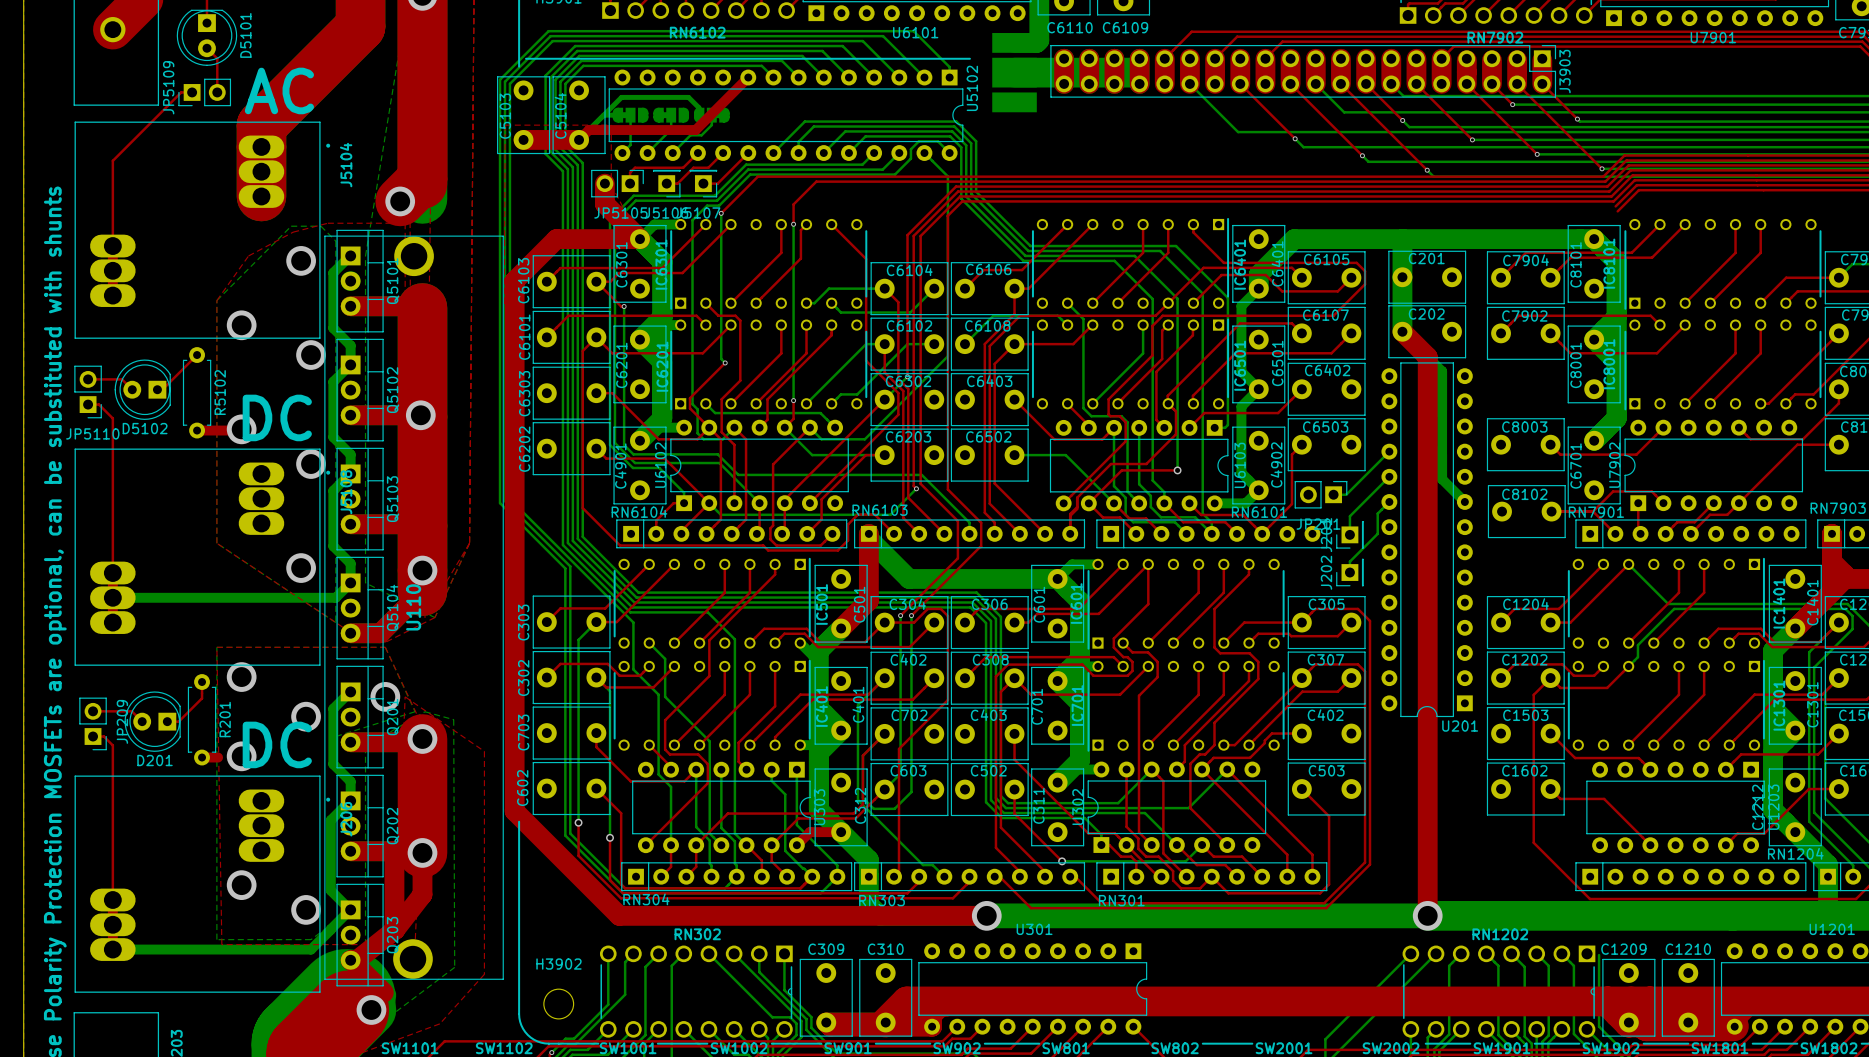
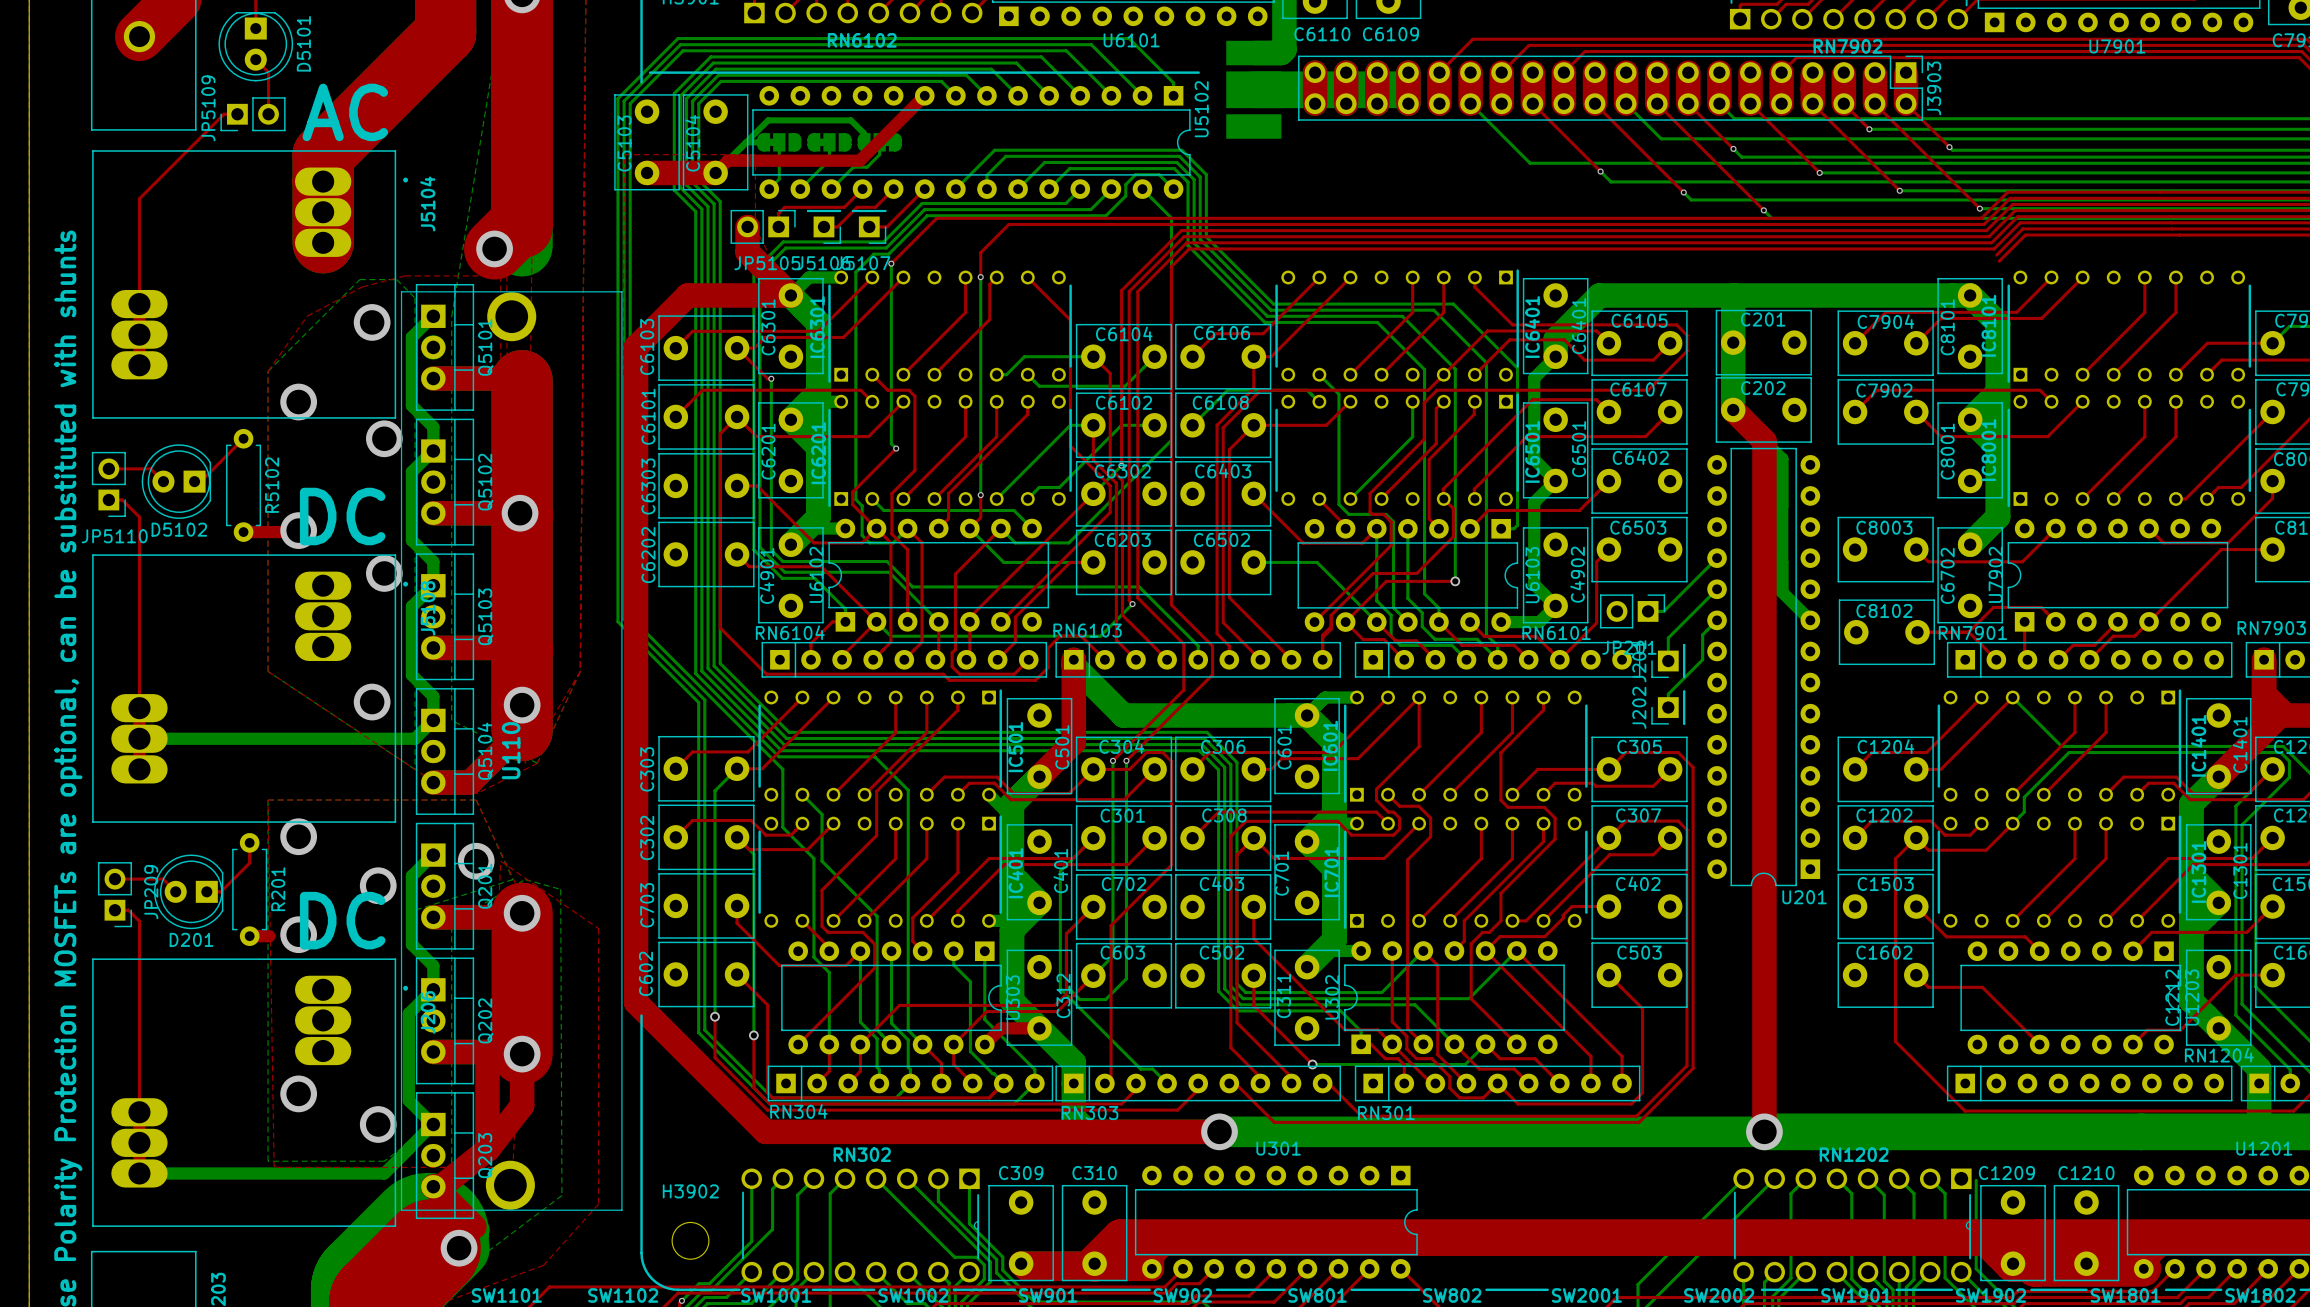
C6701 name: C6701 (1575, 466) -> C6702 (1947, 575)
C402 name: C402 (908, 659) -> C301 (1122, 815)

